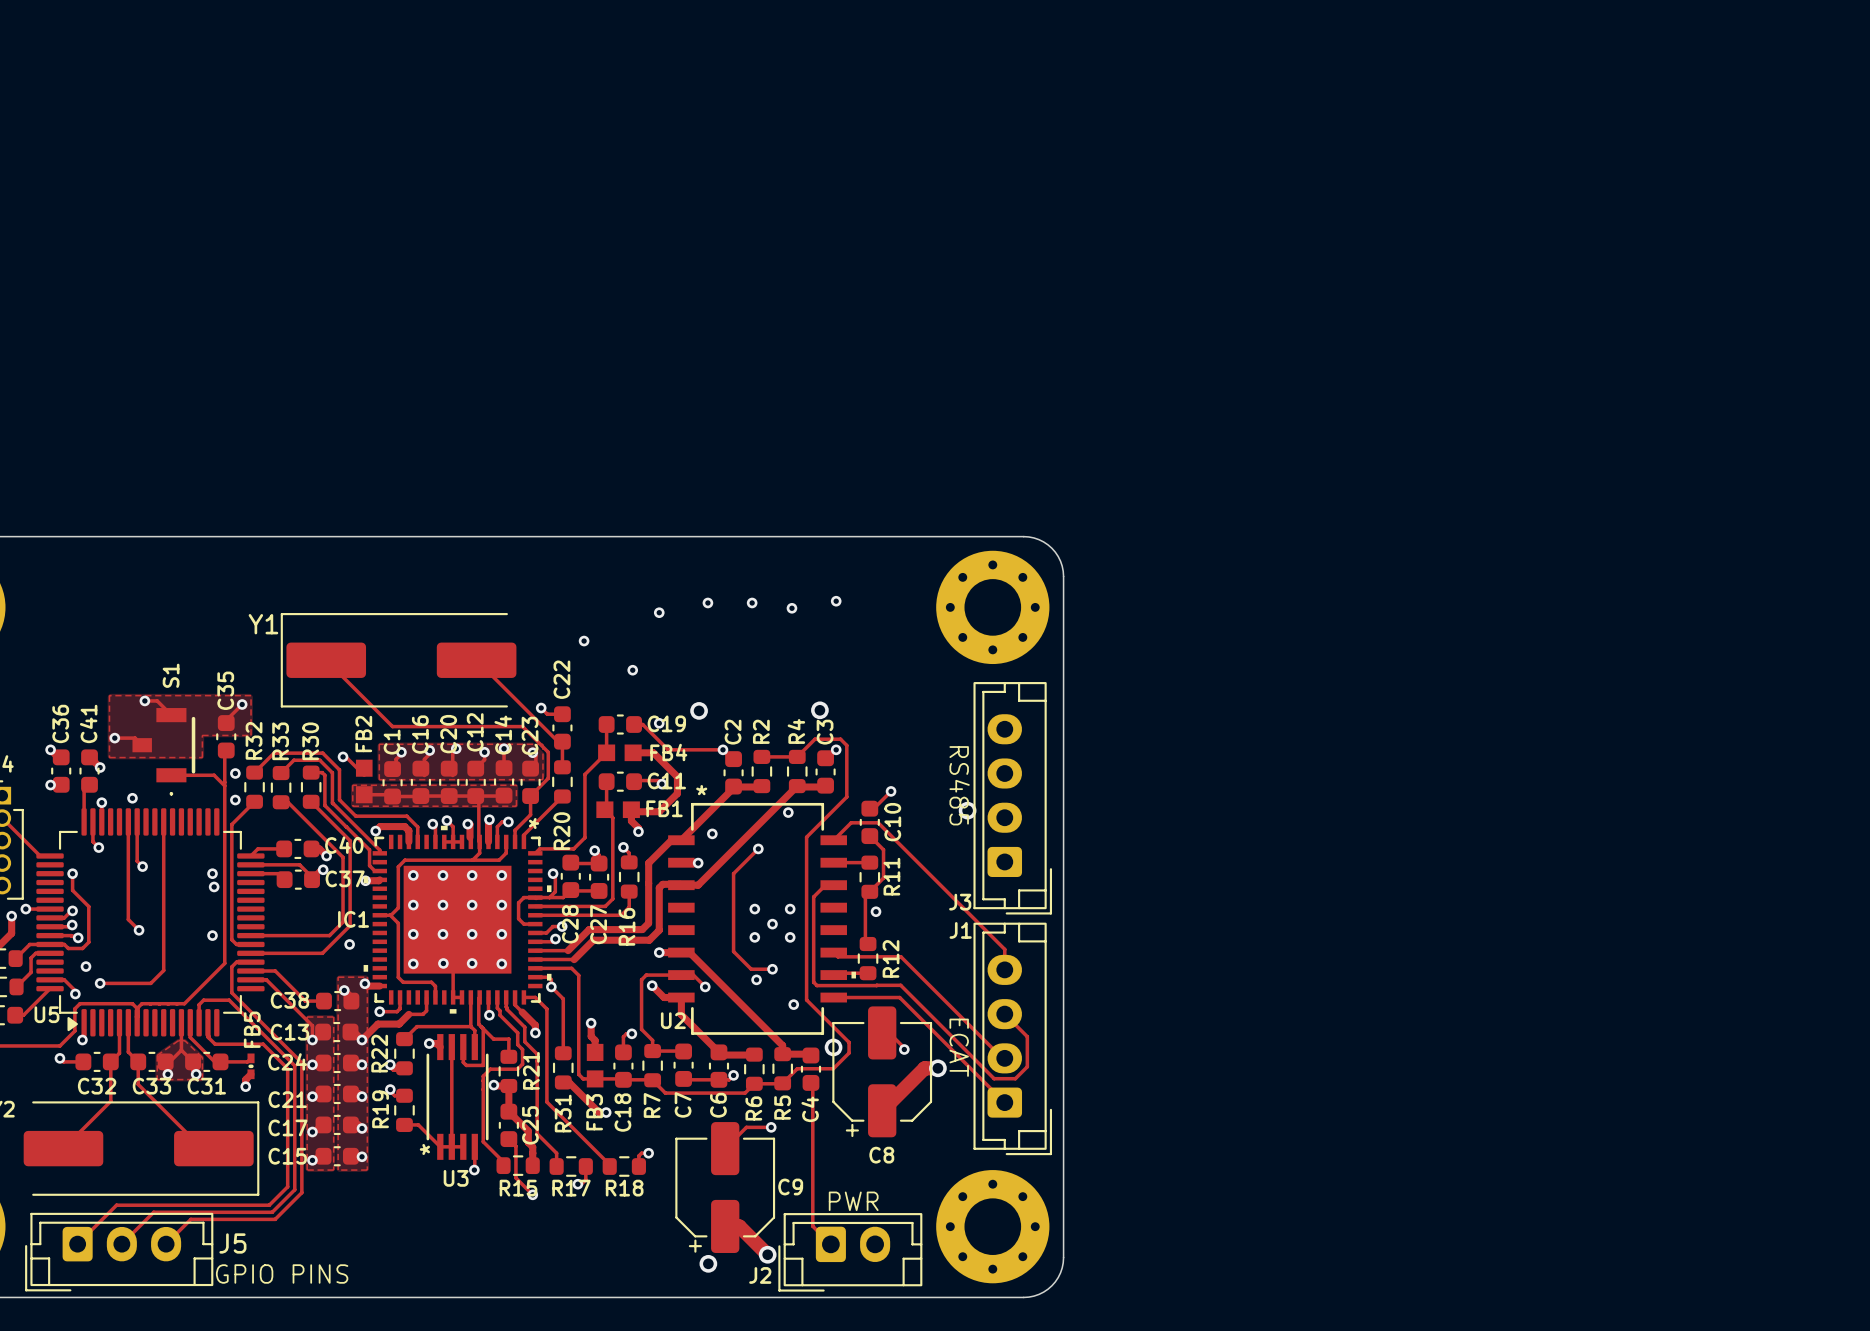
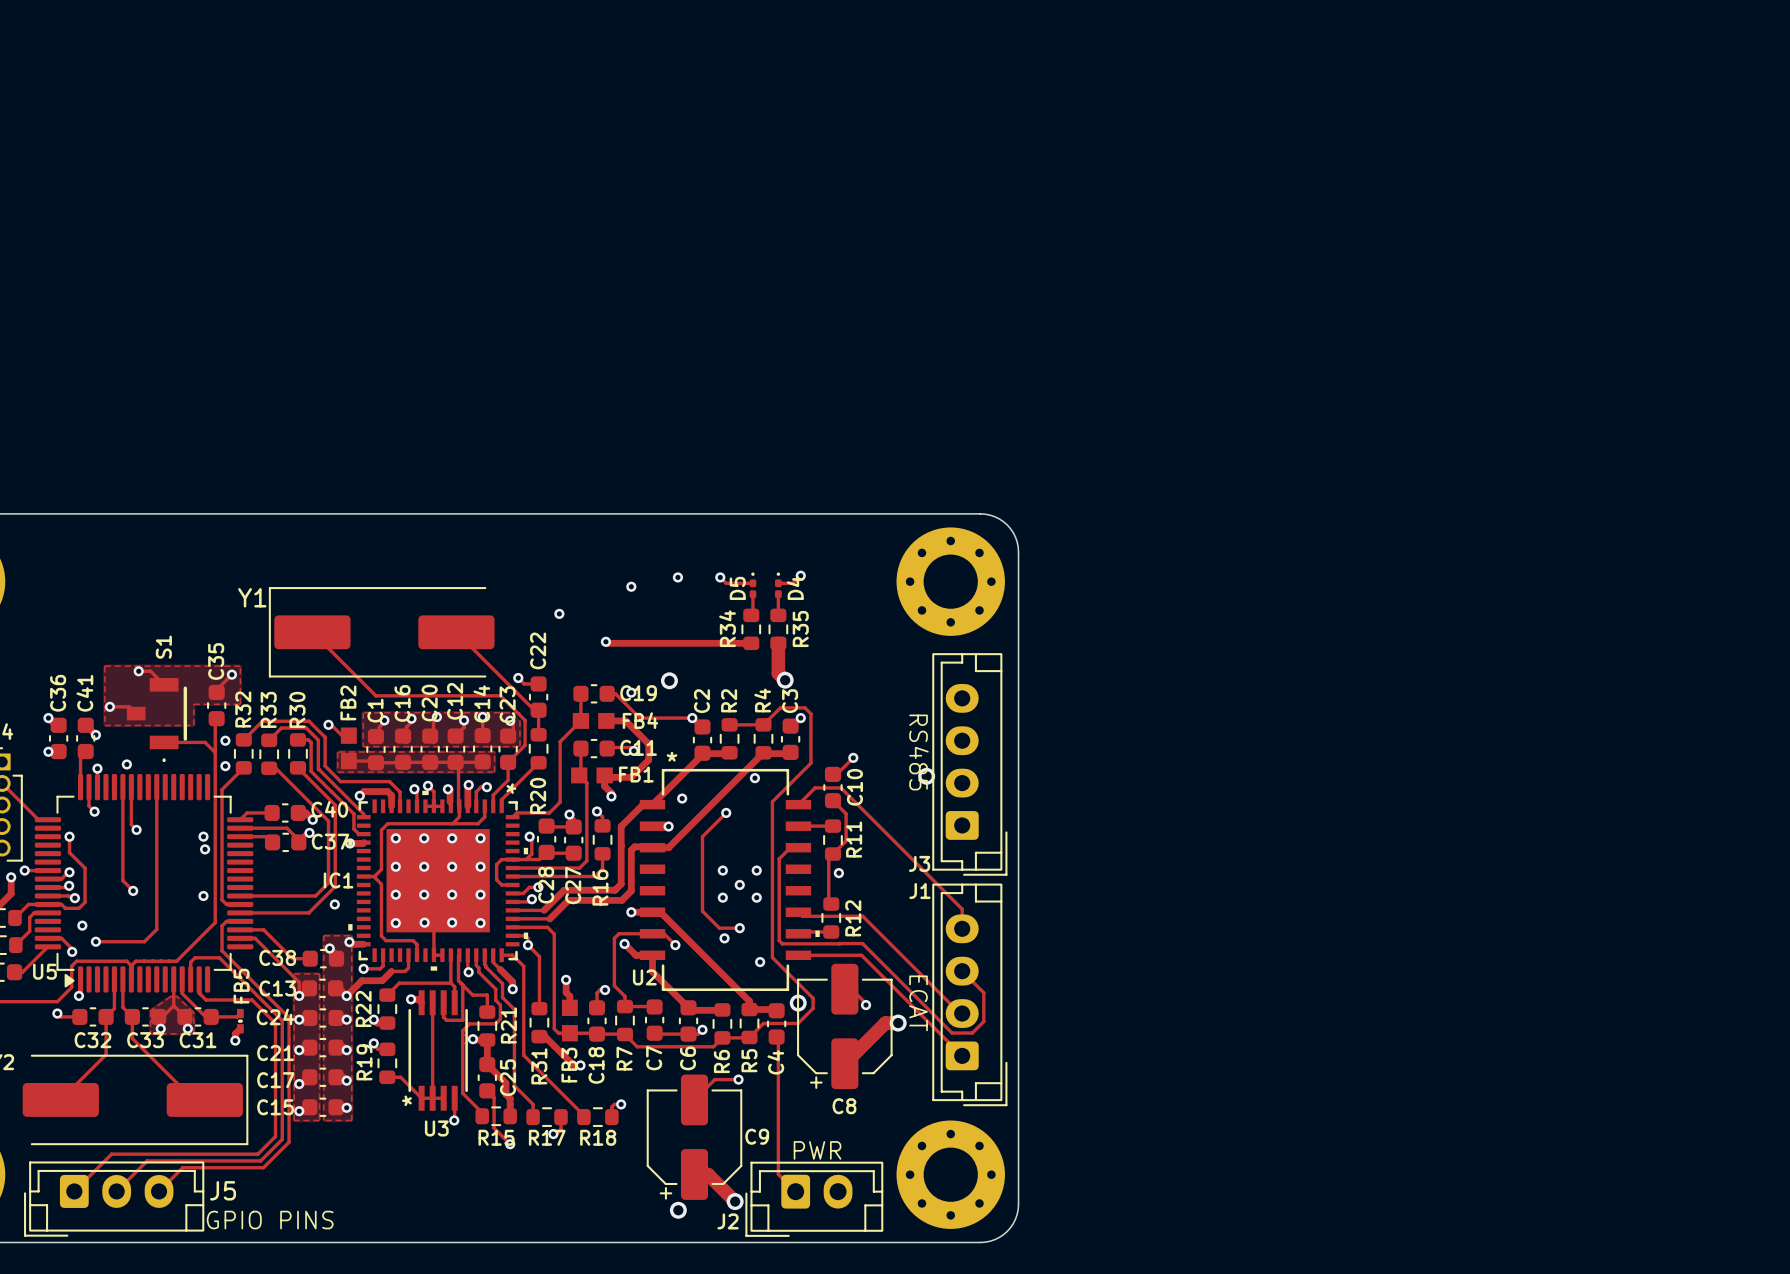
track: none -> (800, 575) (793, 583) (778, 583)
track: none -> (720, 577) (726, 583) (752, 583)
via: (791, 608) -> none
D5: none -> (752, 585)
D4: none -> (778, 585)
track: none -> (752, 594) (752, 615)
track: none -> (778, 594) (778, 615)
R34: none -> (751, 629)
R35: none -> (778, 629)
track: none -> (605, 641) (752, 643)
track: none -> (778, 643) (778, 673) (785, 680)

